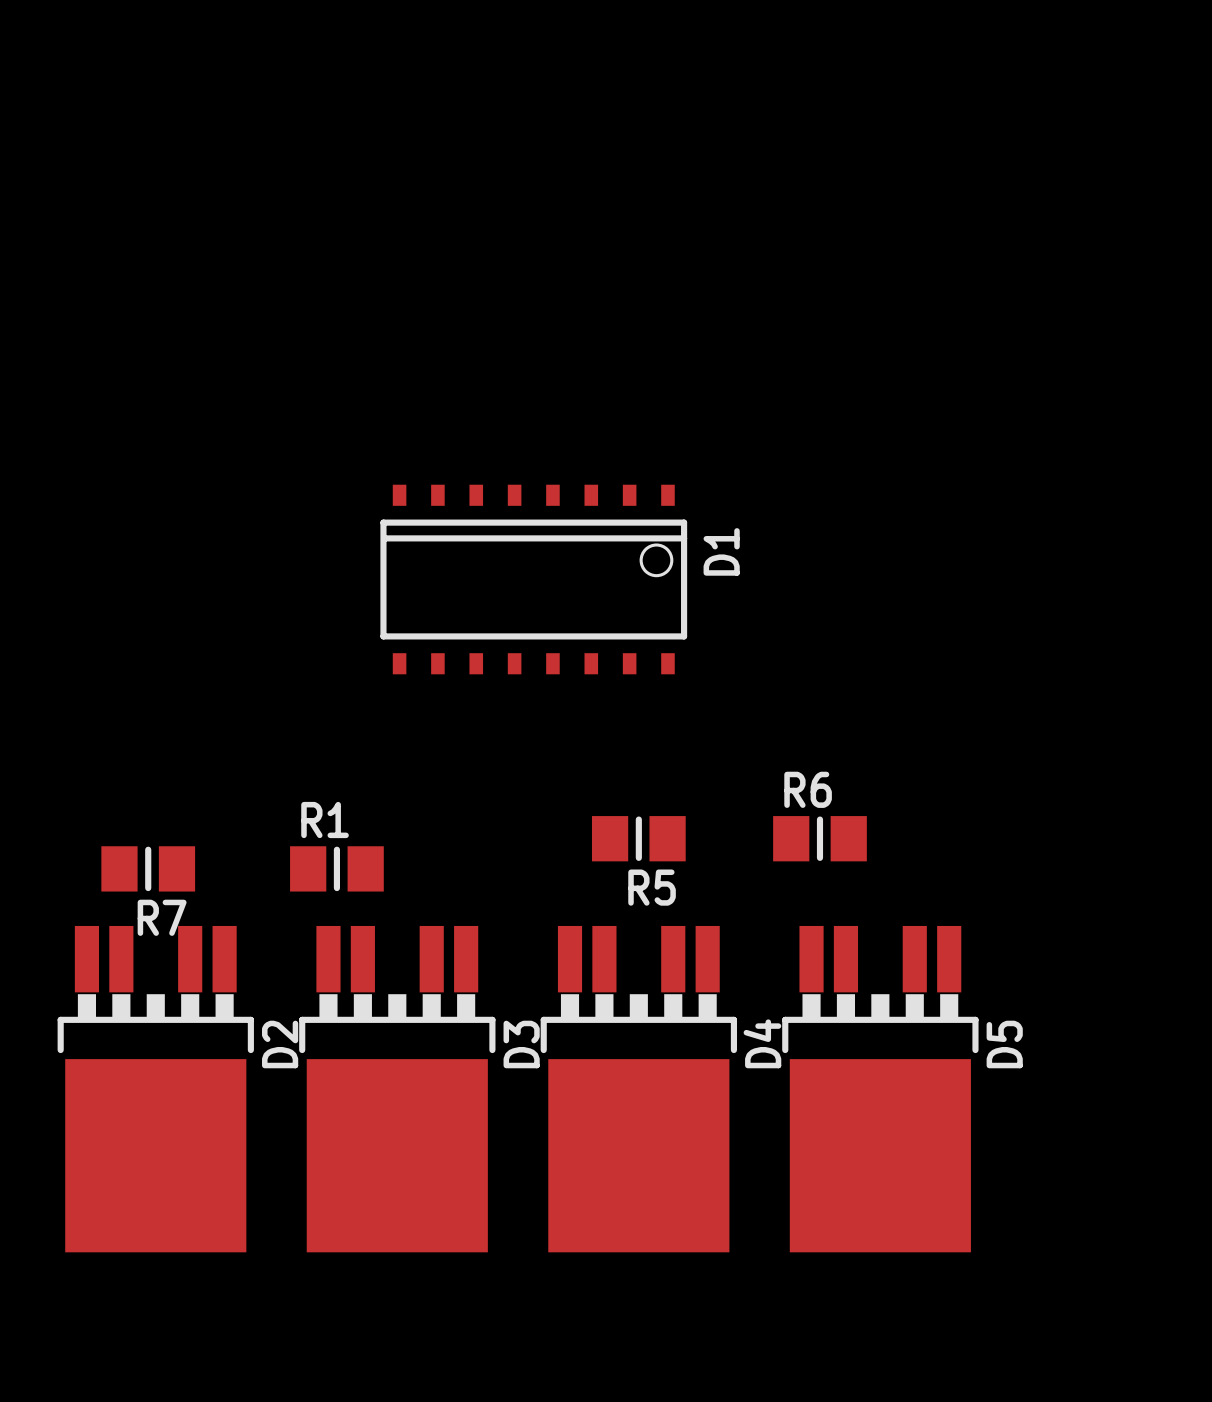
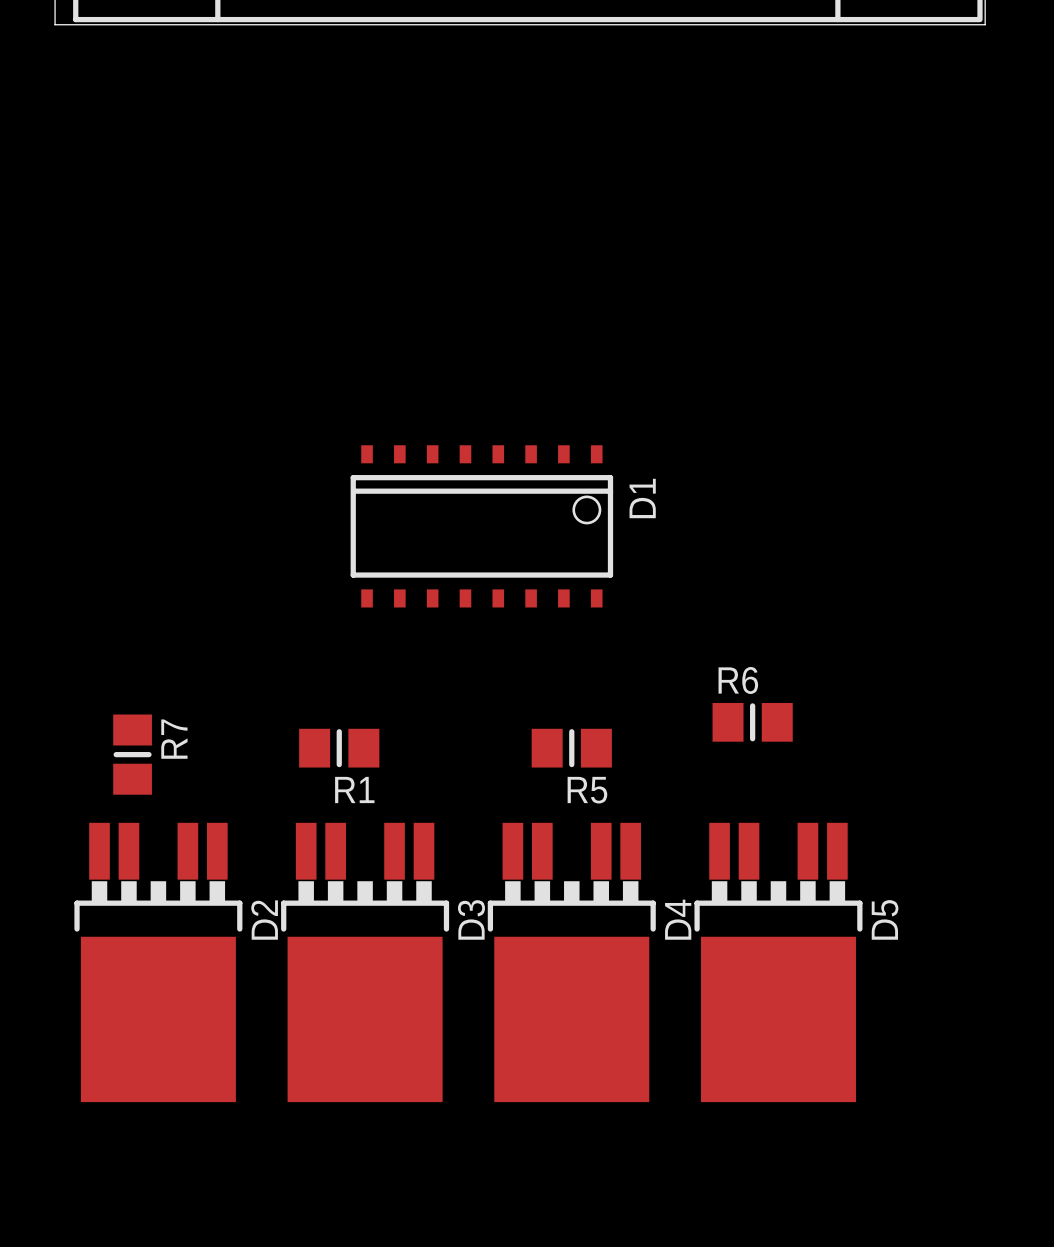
R1 name position: R1 (325, 820) -> R1 (354, 789)
R6 position: (819, 838) -> (752, 722)
R7 rotation: 0° (148, 868) -> 90° clockwise (132, 754)
R1 position: (336, 868) -> (339, 748)
R7 name position: R7 (162, 917) -> R7 (174, 739)

